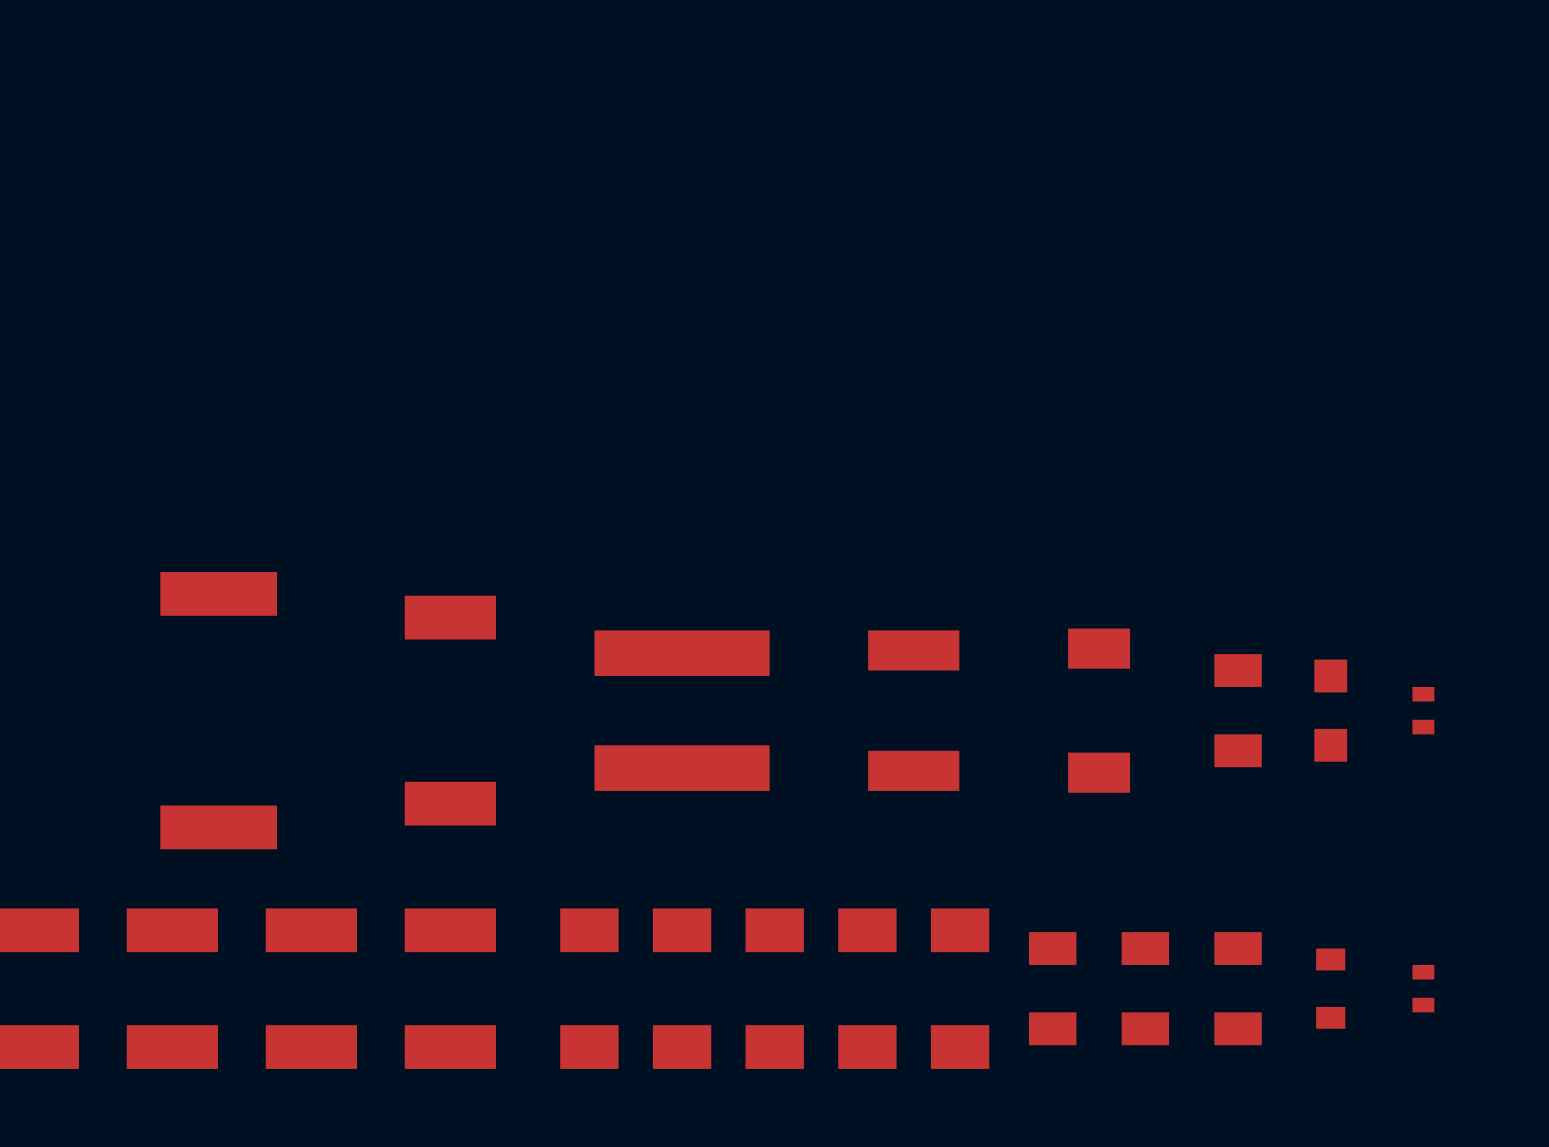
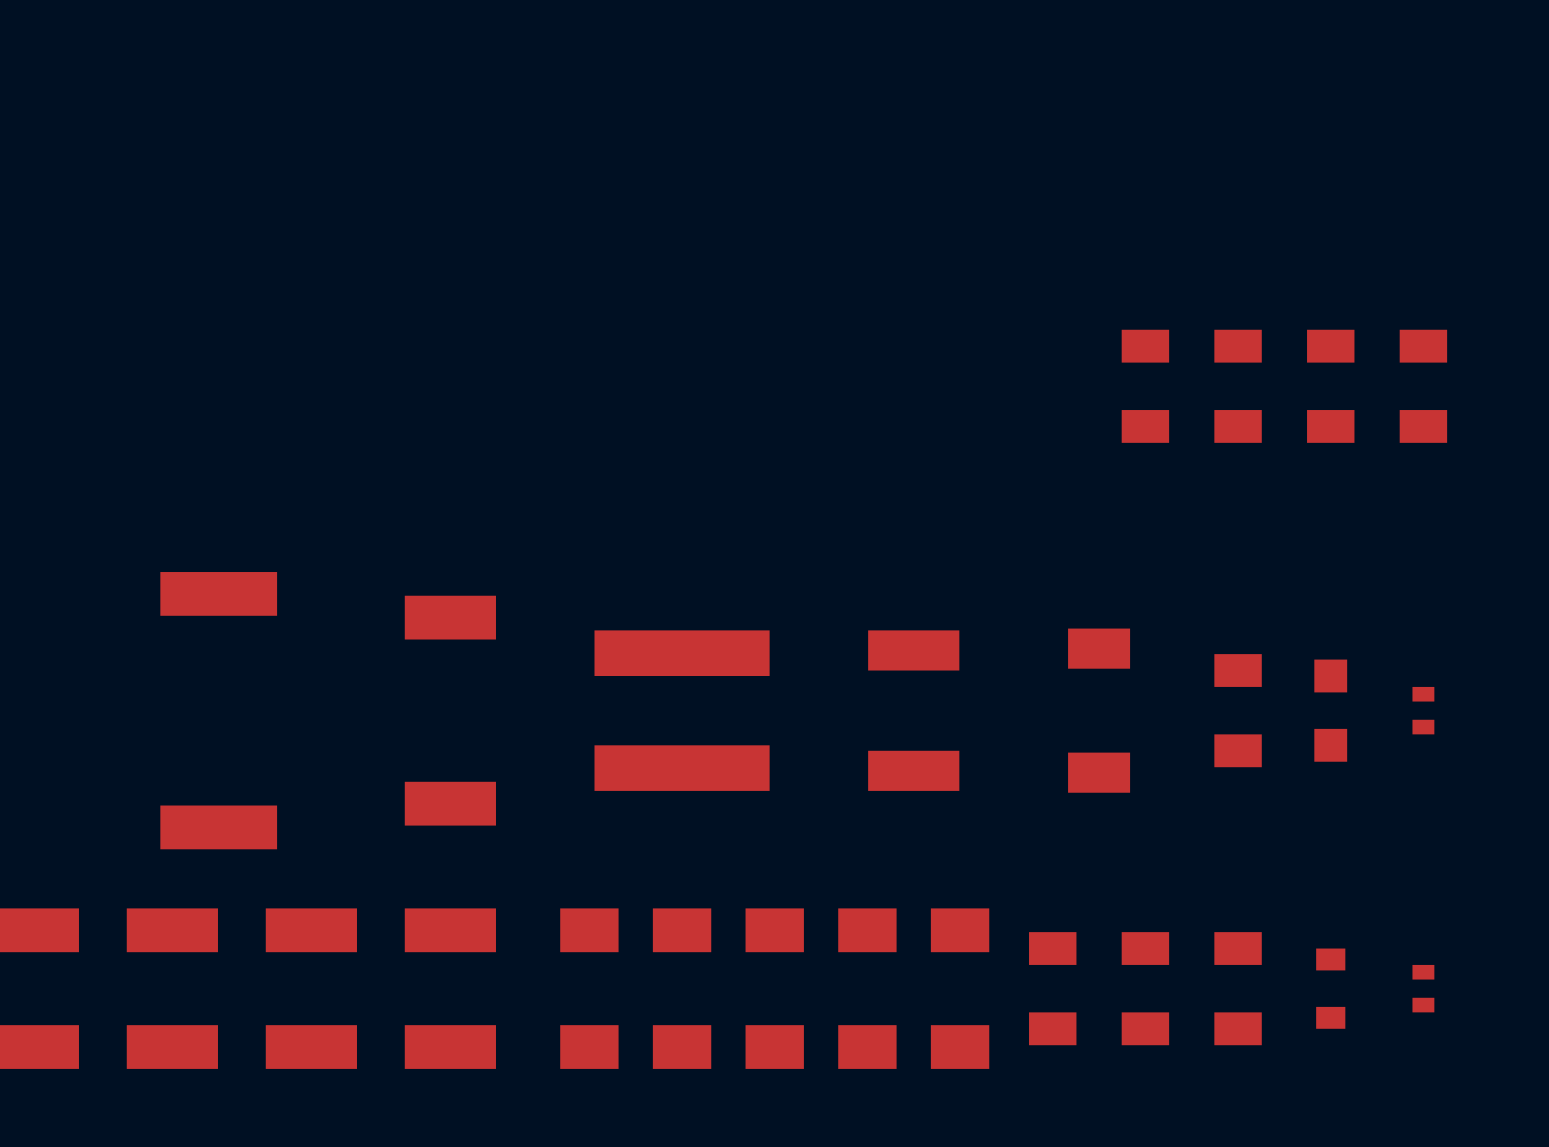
part: none -> (1145, 386)
part: none -> (1238, 386)
part: none -> (1330, 386)
part: none -> (1423, 386)

